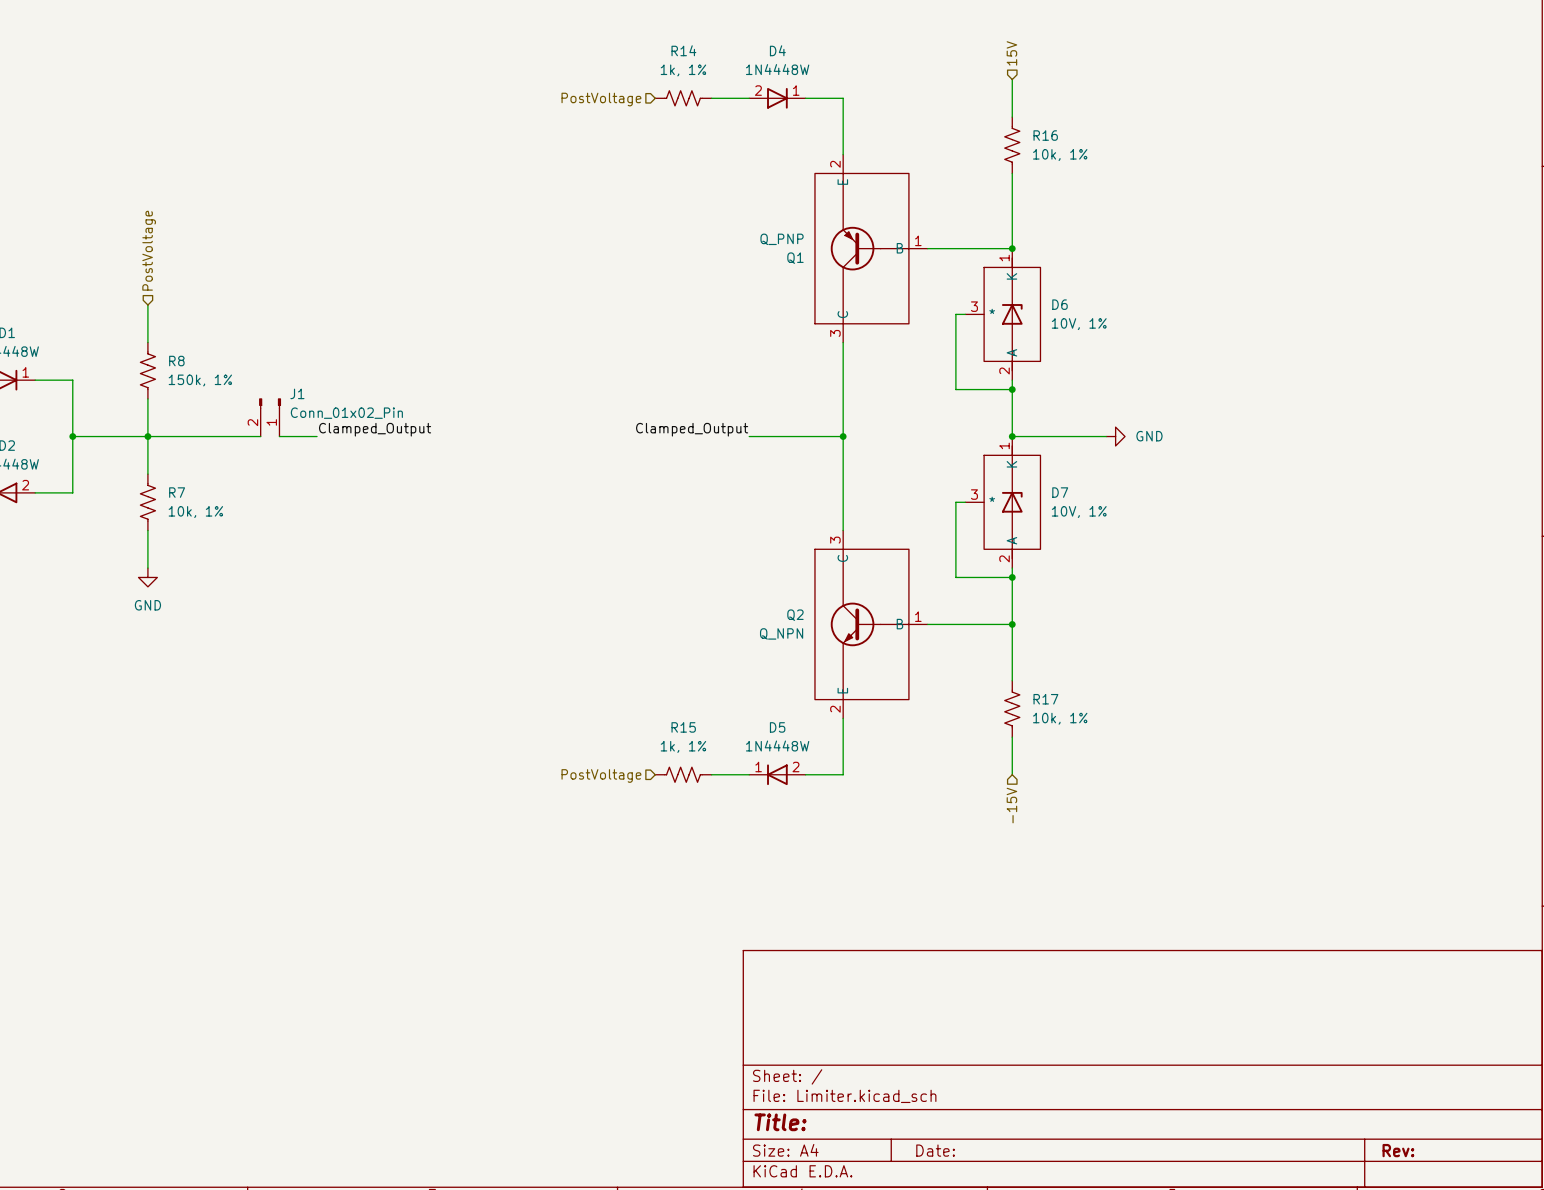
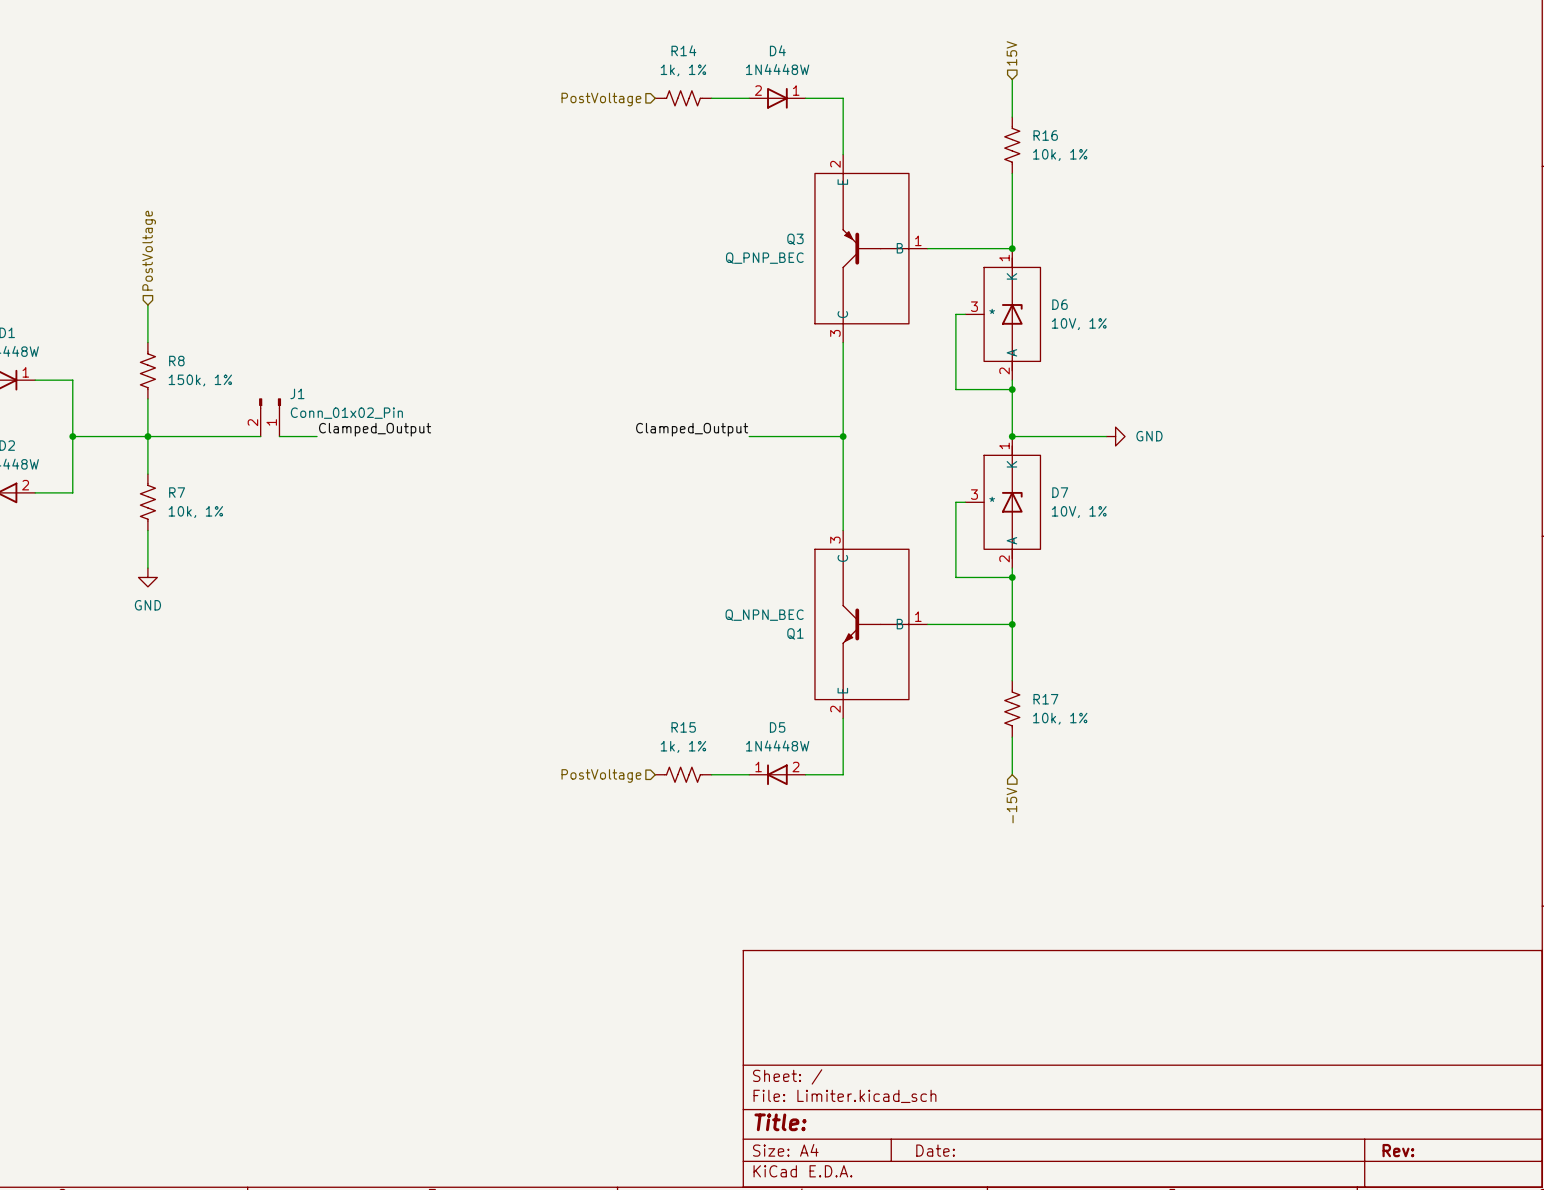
Q1 symbol: [814, 154, 928, 343] -> [814, 530, 928, 719]
Q1 value: Q_PNP (782, 239) -> Q_NPN_BEC (764, 615)
Q3: none -> Q_PNP_BEC (871, 248)
Q2: Q_NPN (871, 624) -> none

